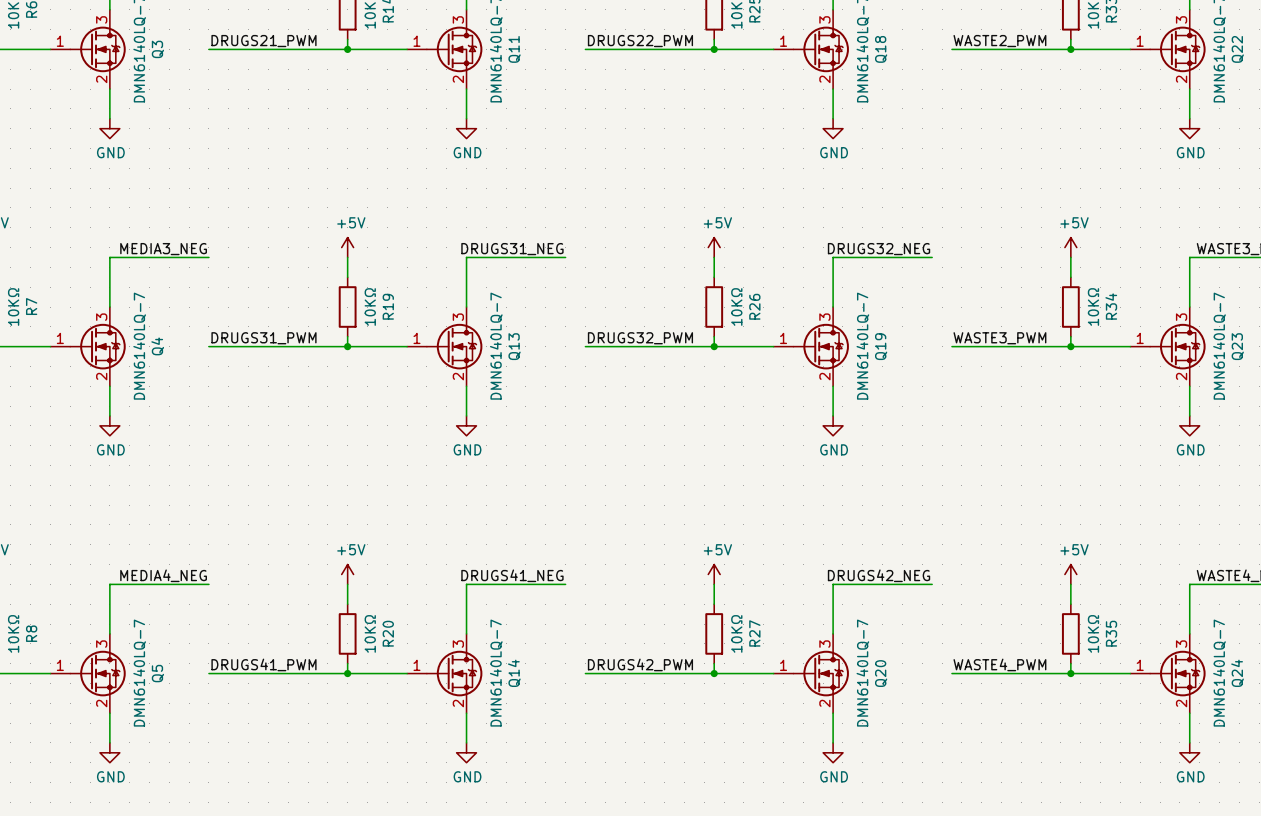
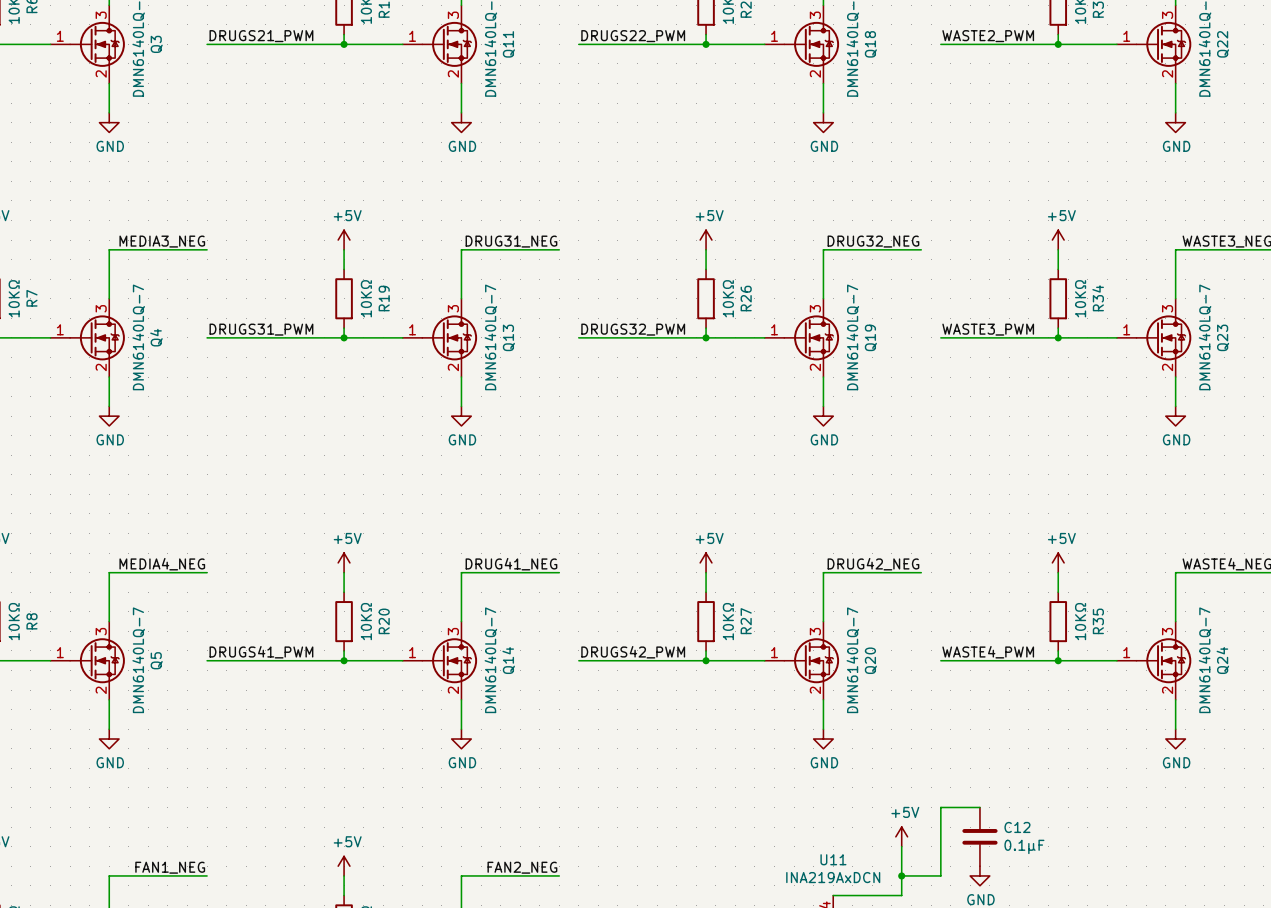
label: DRUGS31_NEG (512, 249) -> DRUG31_NEG (511, 241)
label: DRUGS32_NEG (879, 249) -> DRUG32_NEG (873, 241)
label: DRUGS41_NEG (512, 575) -> DRUG41_NEG (511, 564)
label: DRUGS42_NEG (879, 575) -> DRUG42_NEG (873, 564)

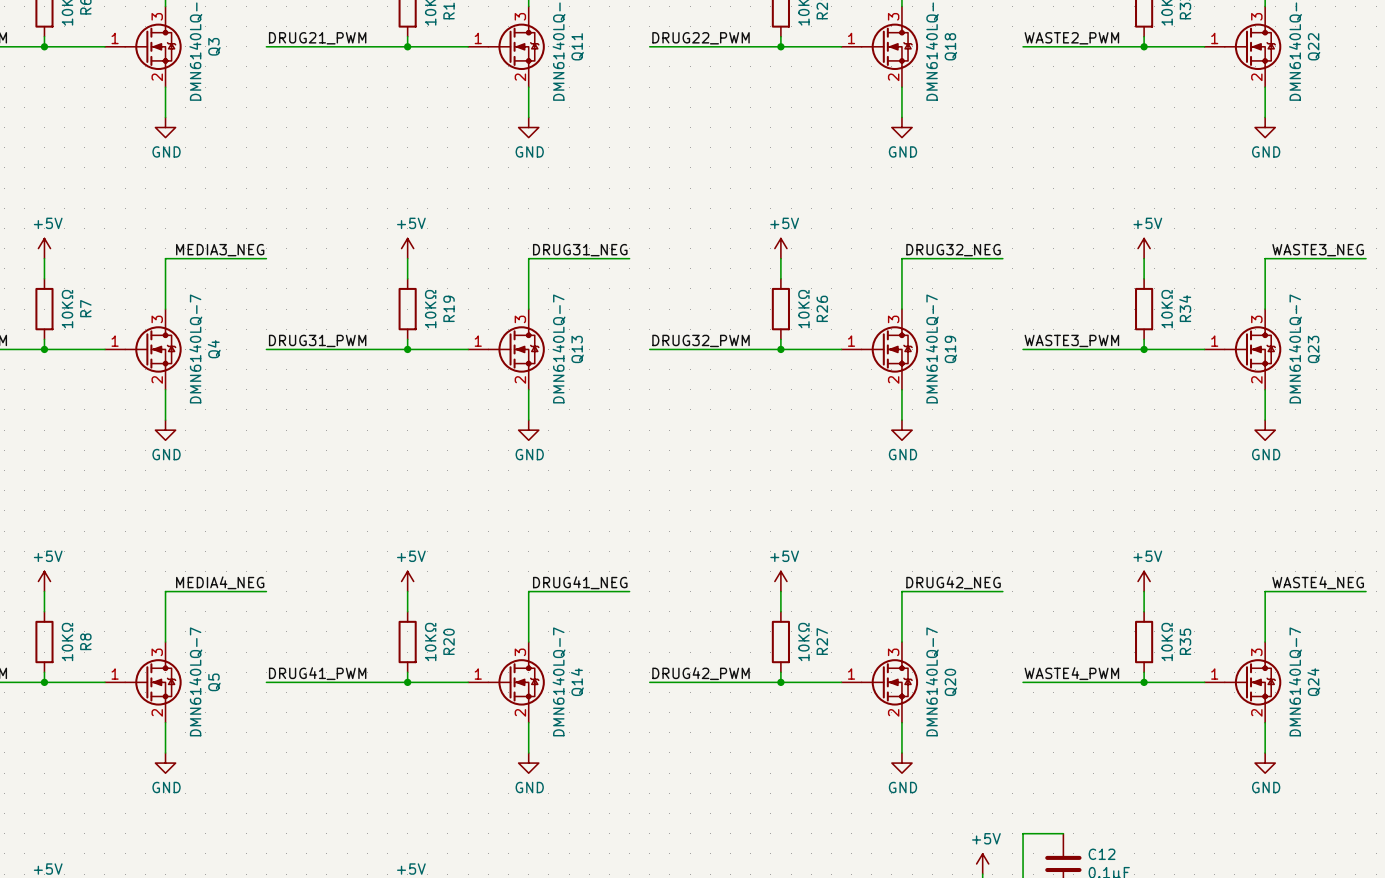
label: DRUGS21_PWM (261, 36) -> DRUG21_PWM (317, 38)
label: DRUGS22_PWM (633, 36) -> DRUG22_PWM (701, 38)
label: DRUGS31_PWM (261, 329) -> DRUG31_PWM (317, 340)
label: DRUGS32_PWM (633, 329) -> DRUG32_PWM (701, 340)
label: DRUGS41_PWM (261, 652) -> DRUG41_PWM (317, 673)
label: DRUGS42_PWM (633, 652) -> DRUG42_PWM (701, 673)

